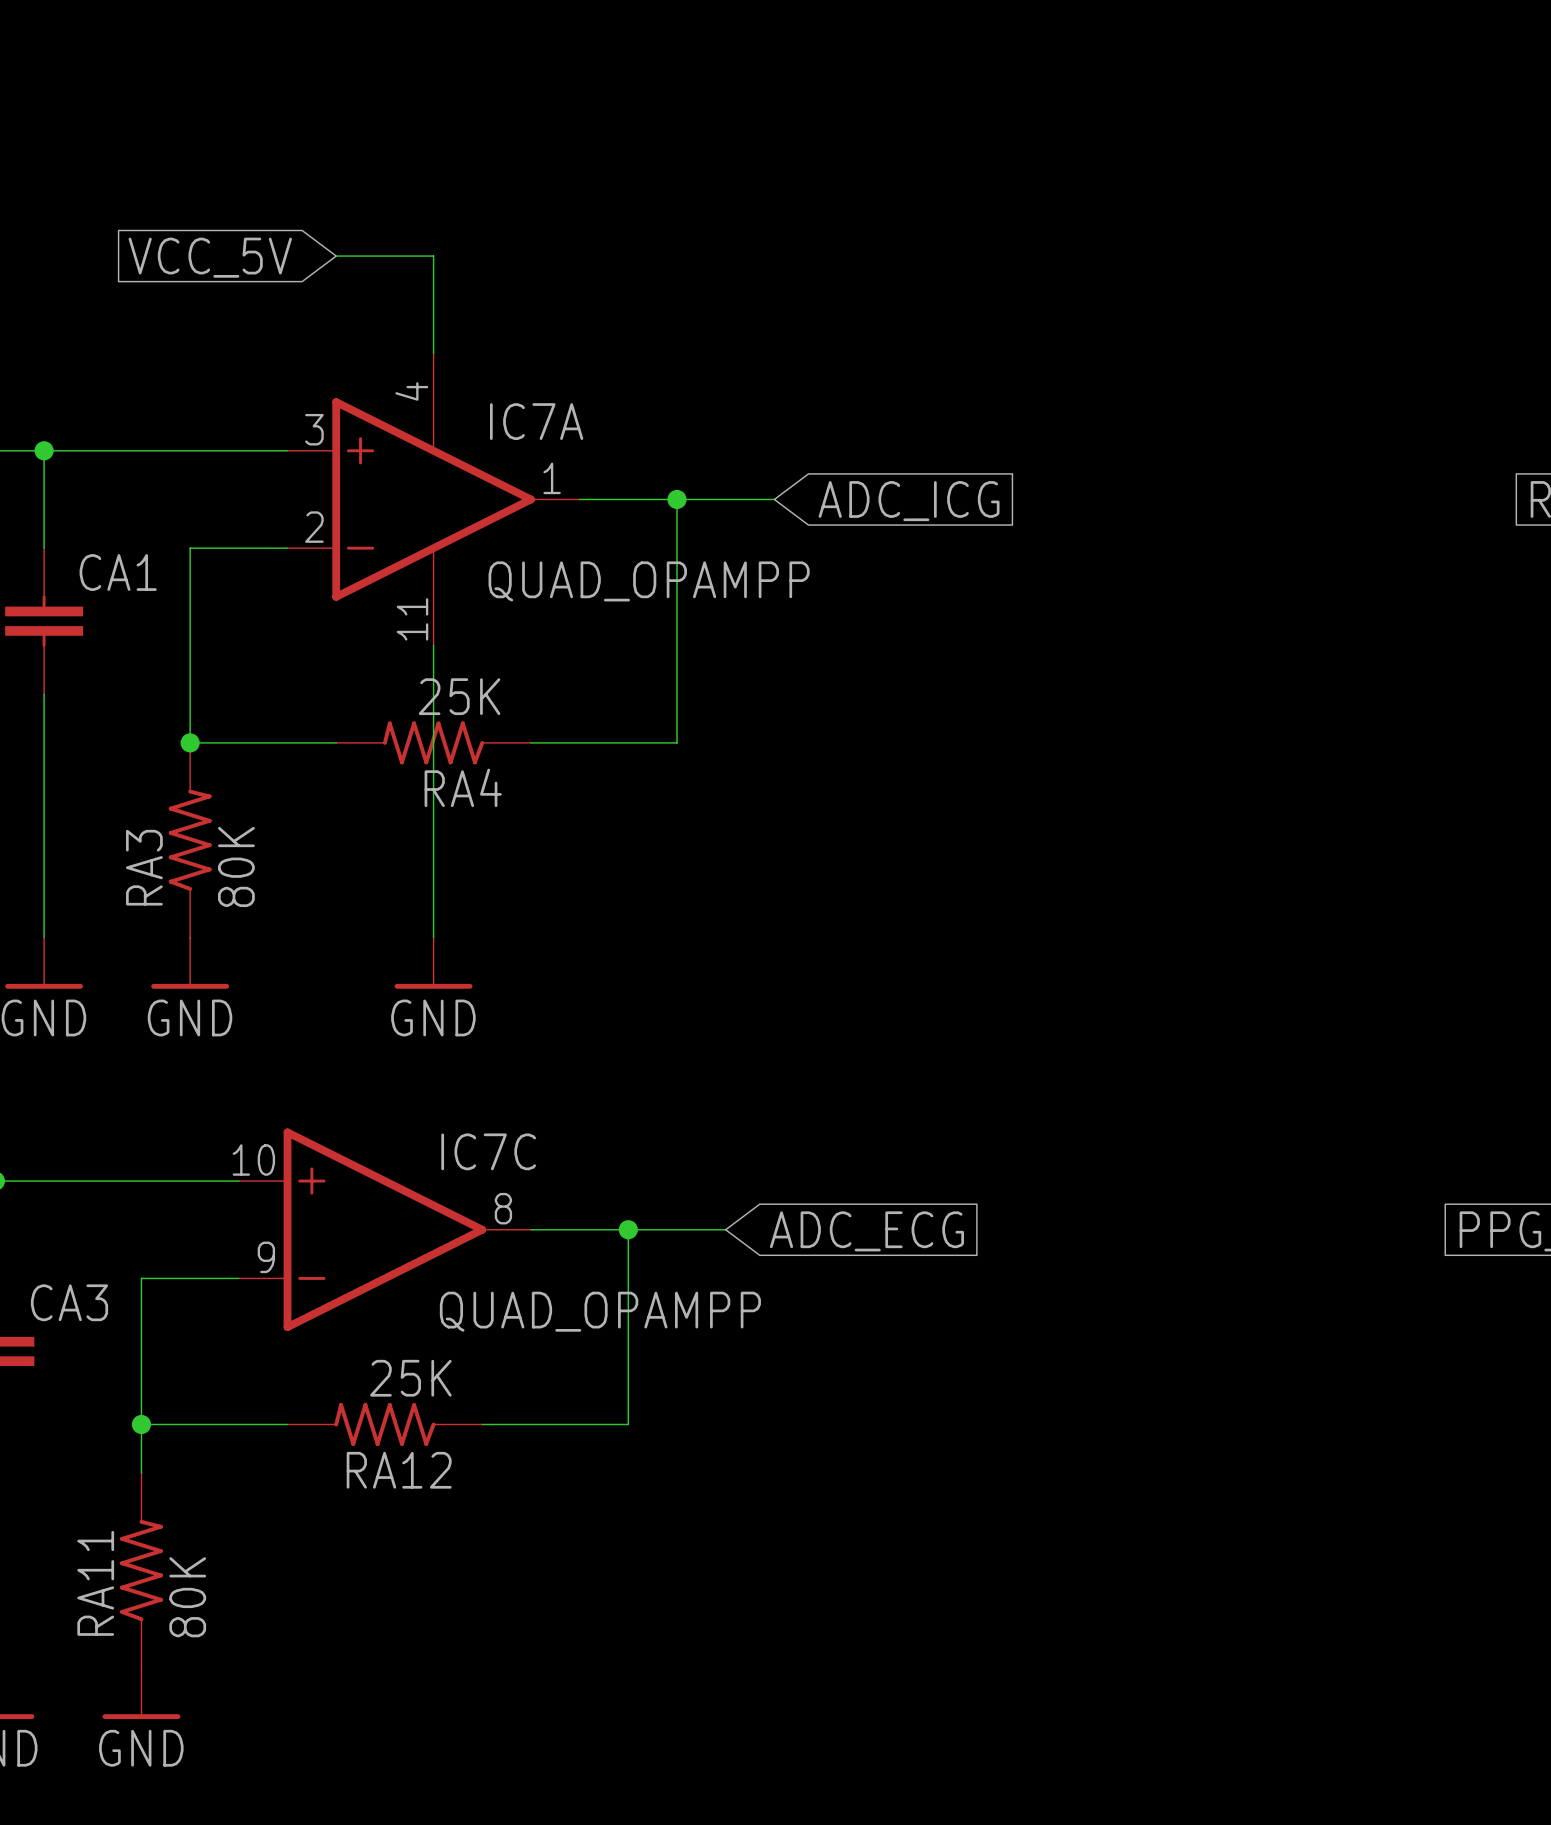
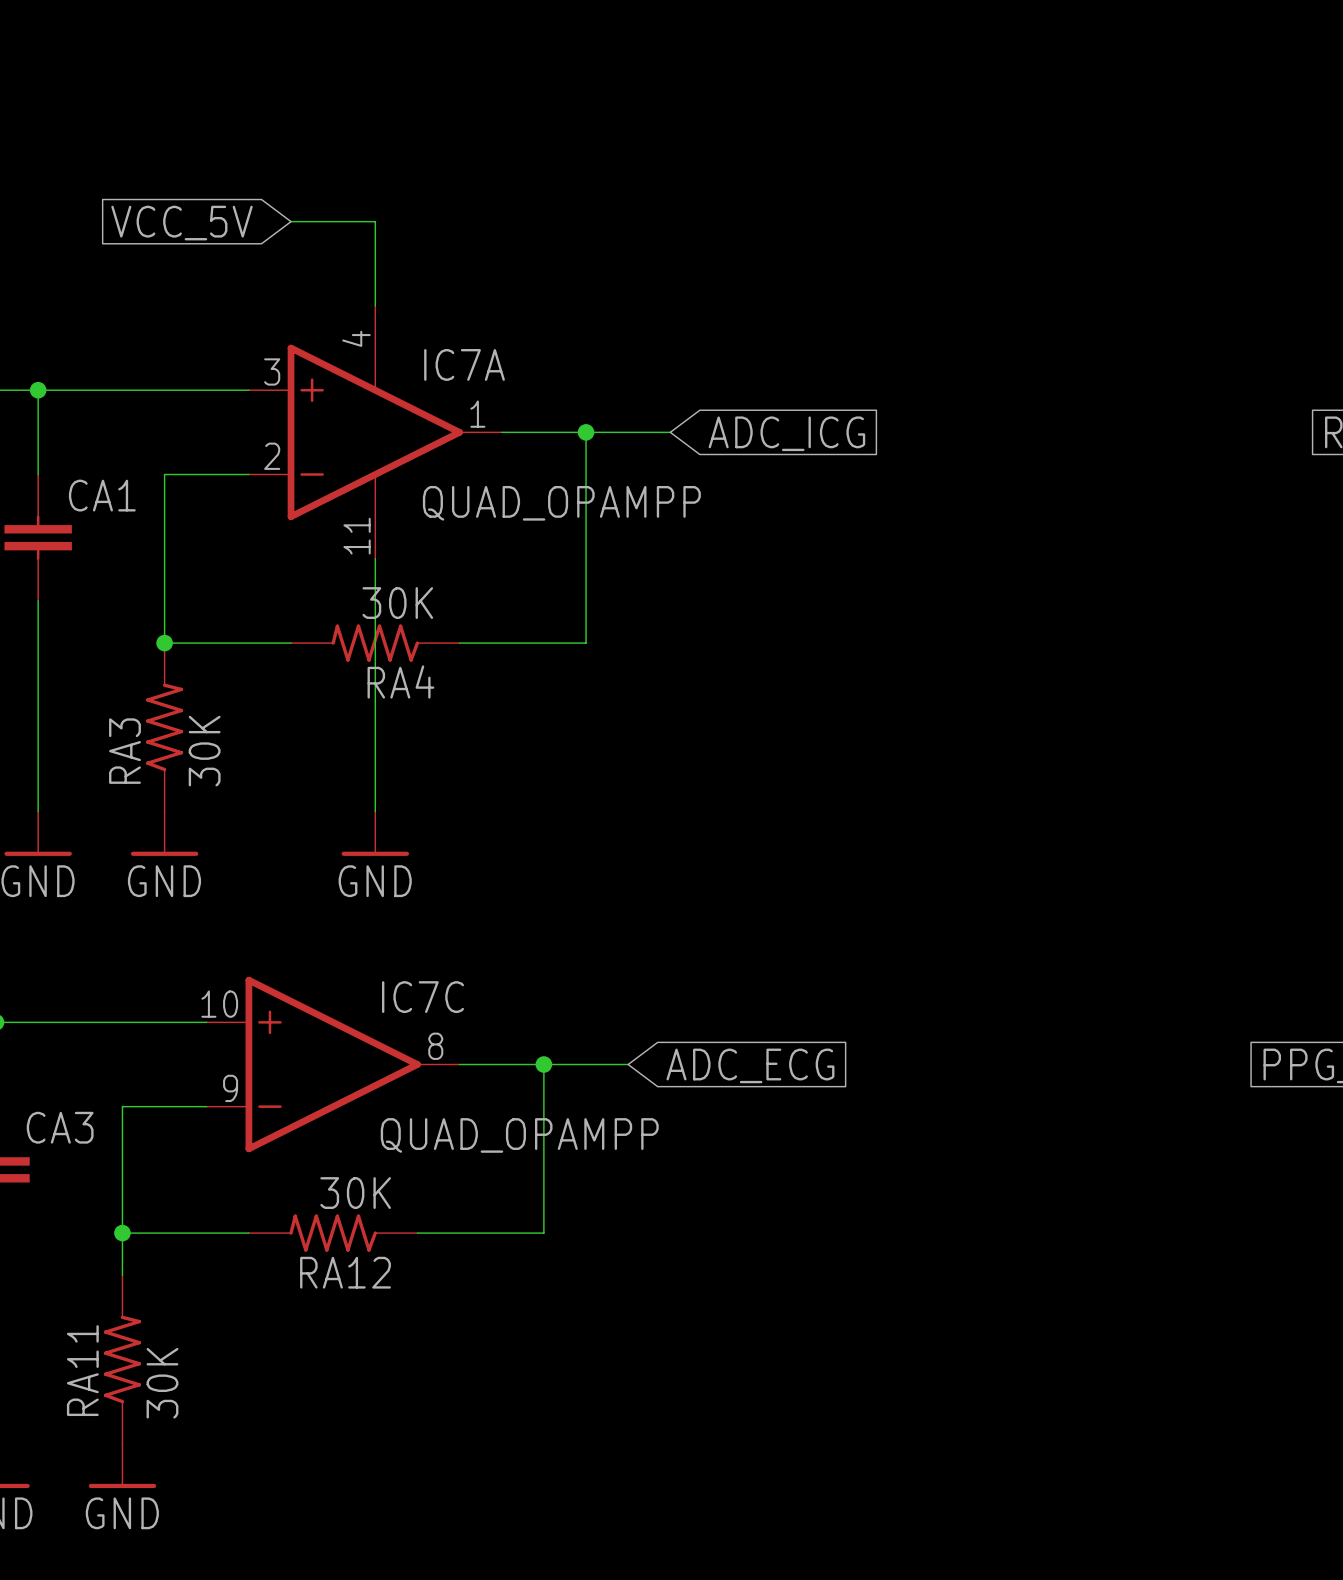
RA4 value: 25K (459, 696) -> 30K (397, 603)
RA3 value: 80K (236, 866) -> 30K (204, 751)
RA12 value: 25K (410, 1378) -> 30K (355, 1193)
RA11 value: 80K (187, 1597) -> 30K (162, 1383)

